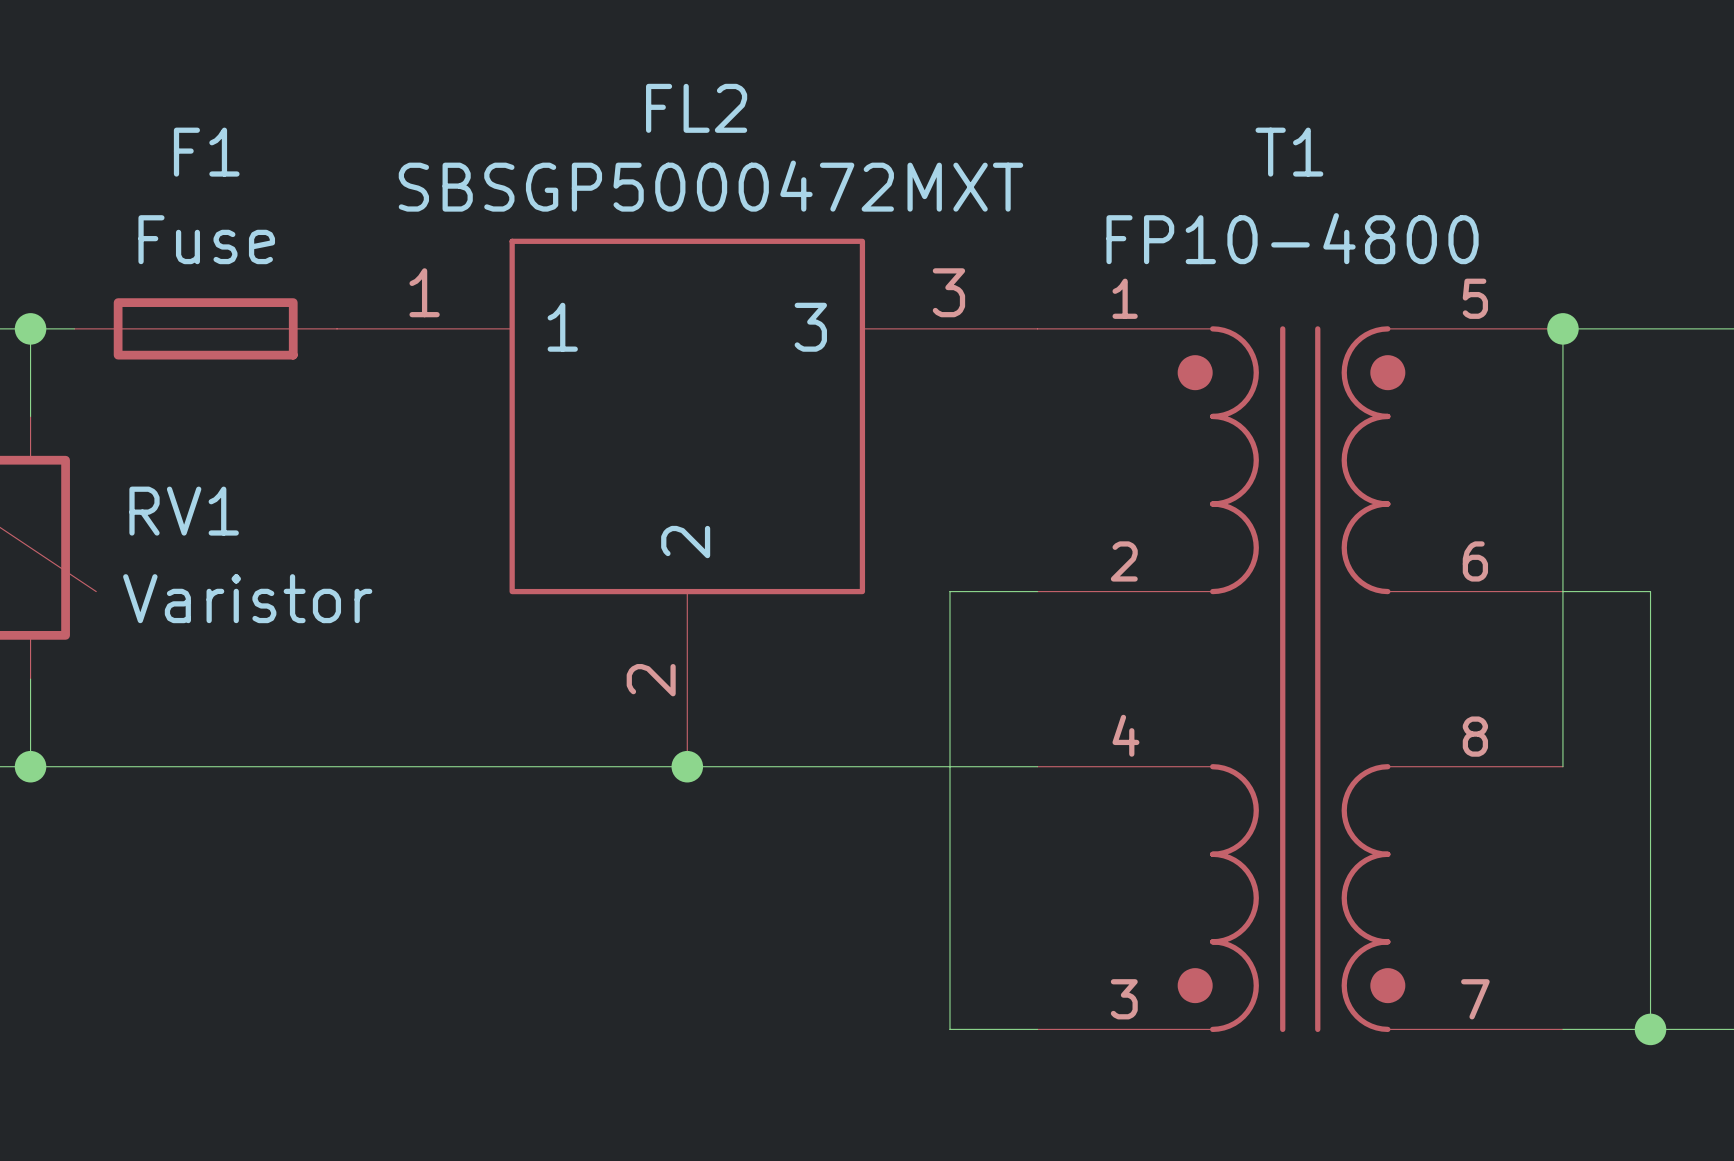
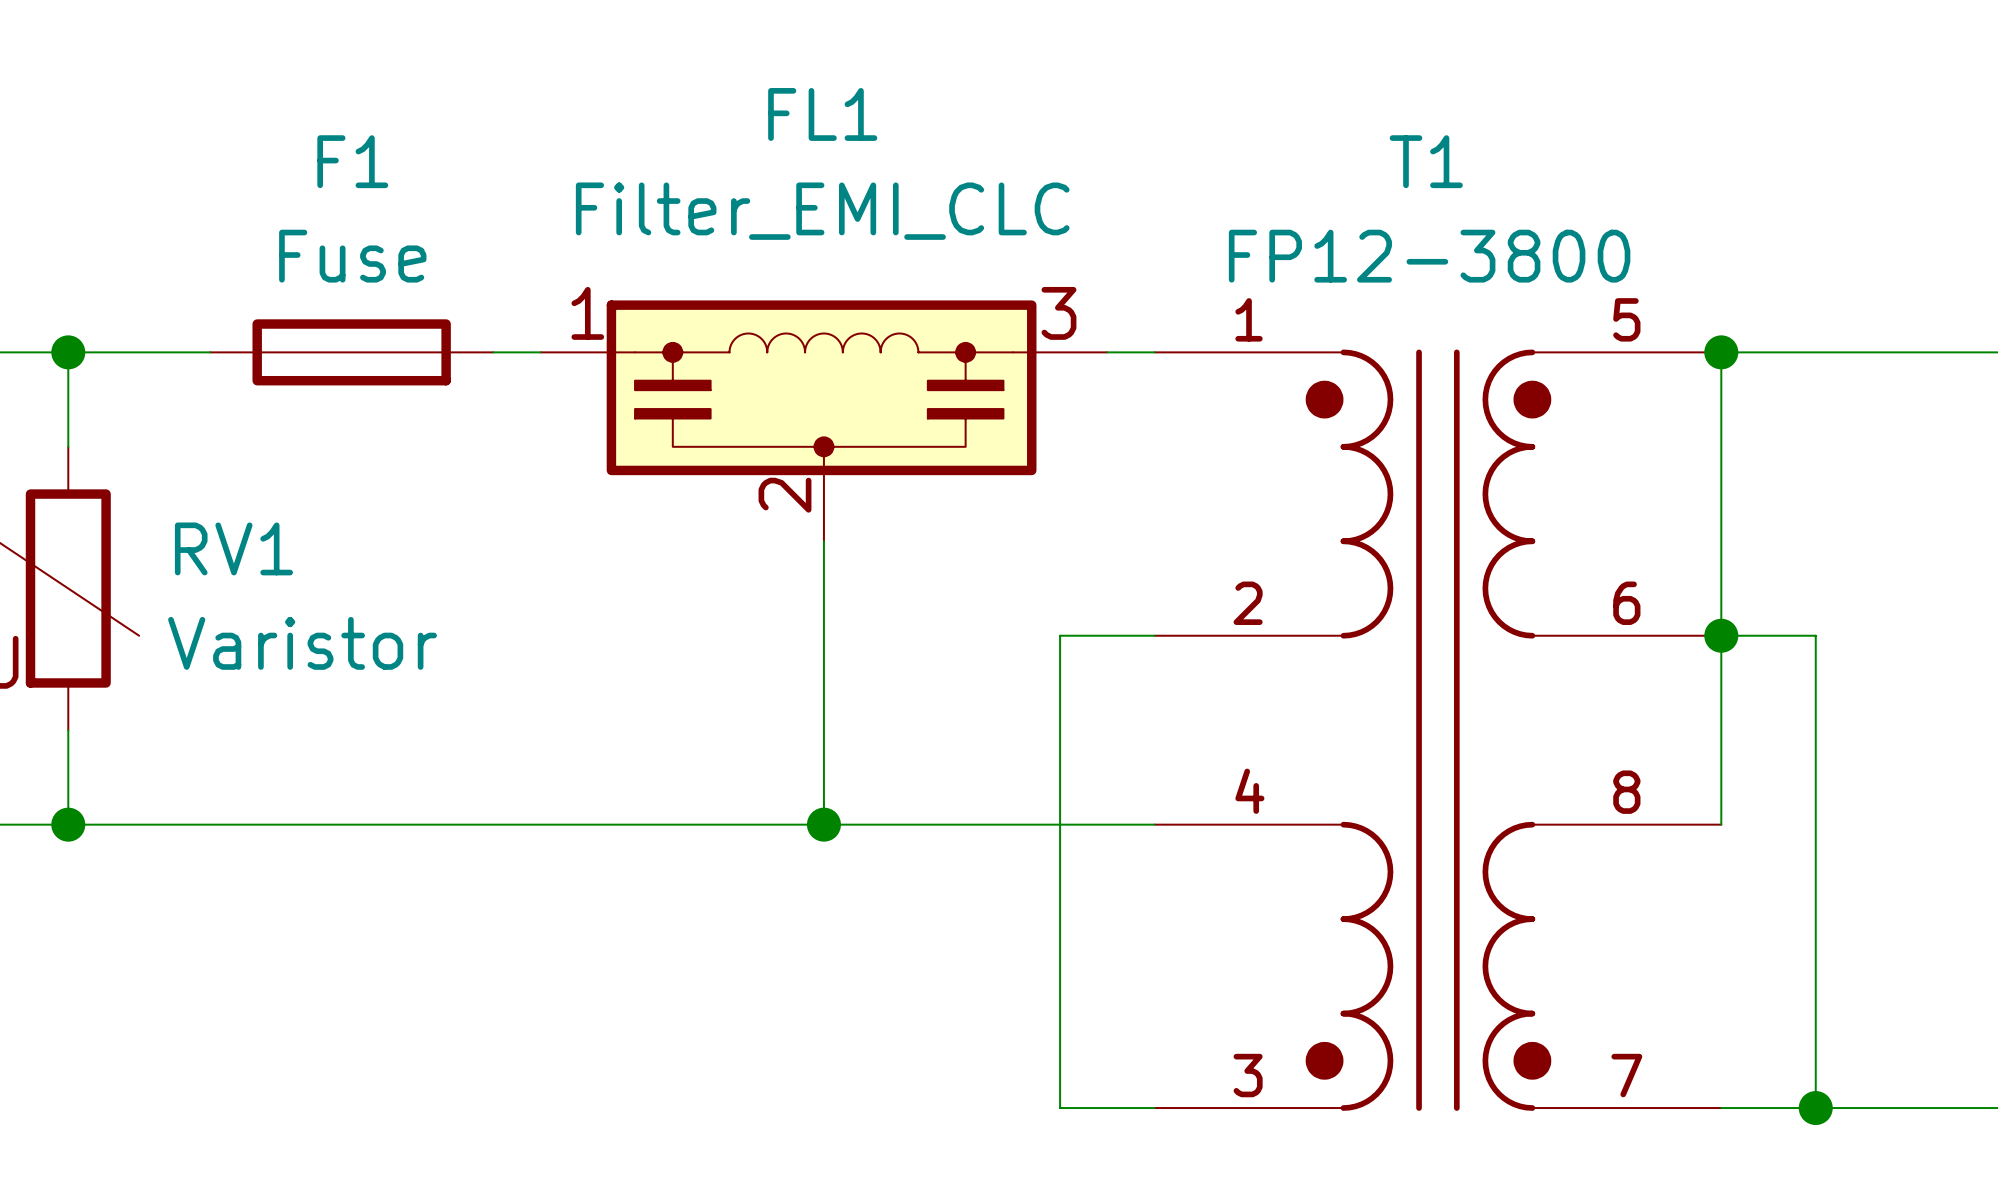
T1 value: FP10-4800 (1292, 238) -> FP12-3800 (1429, 256)
F1 position: (205, 328) -> (351, 352)
FL1: none -> Filter_EMI_CLC (823, 420)
FL2: SBSGP5000472MXT (687, 502) -> none
wire: none -> (823, 541) (823, 824)
junction: none -> (1721, 635)
junction position: (687, 766) -> (823, 824)

